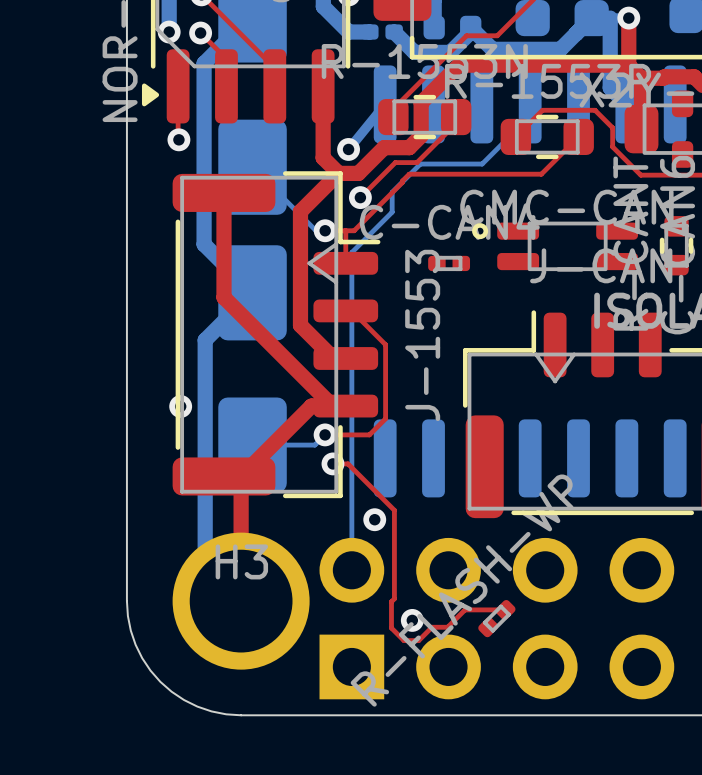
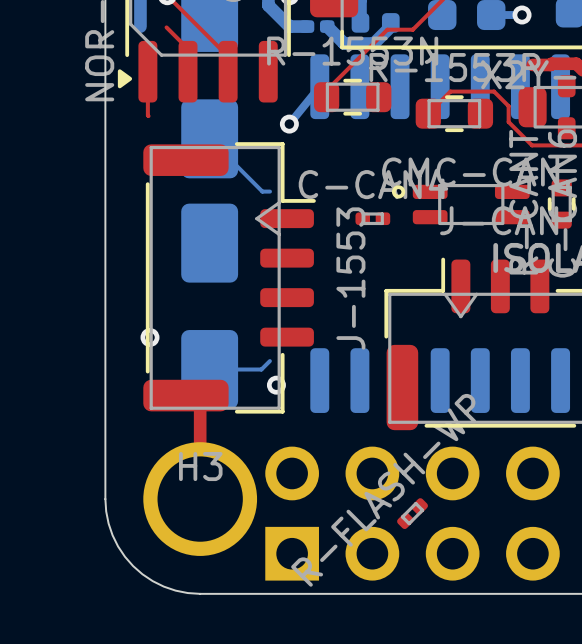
bottom track: (252, 14) (204, 63) (204, 244) (252, 292) (205, 340) (205, 565) (241, 601) -> none
bottom track: (591, 18) (560, 49) (492, 49) (470, 27) (471, 28) -> none
bottom track: (610, 18) (610, 87) (626, 104) -> none
top track: (628, 18) (628, 64) -> none
via: (169, 32) -> none
via: (200, 33) -> none
top track: (323, 86) (323, 157) (338, 173) -> none
bottom track: (530, 104) (530, 116) (482, 164) (420, 164) (392, 192) (392, 212) (351, 252) (351, 570) -> none
top track: (456, 117) (456, 123) (416, 162) (395, 162) (360, 197) -> none
top track: (641, 129) (641, 78) (628, 65) (458, 65) (421, 102) (421, 135) (409, 147) (384, 147) (358, 173) (338, 173) -> none
top track: (578, 136) (541, 174) (409, 174) (354, 230) (325, 230) -> none
via: (178, 139) -> none
top track: (338, 173) (300, 211) (300, 325) (333, 358) (345, 358) -> none
top track: (223, 192) (223, 297) (332, 406) -> none
via: (360, 197) -> none
via: (325, 230) -> none
top track: (345, 230) (345, 263) -> none
top track: (345, 310) (351, 310) (385, 344) (385, 418) (369, 434) (325, 434) -> none
top track: (345, 406) (311, 406) (241, 476) (223, 476) -> none
via: (325, 434) -> none
top track: (332, 463) (348, 463) (394, 510) (394, 598) (391, 601) (391, 628) (403, 640) (418, 640) (432, 627) (447, 627) (465, 609) (505, 609) -> none
via: (374, 519) -> none
via: (412, 620) -> none

